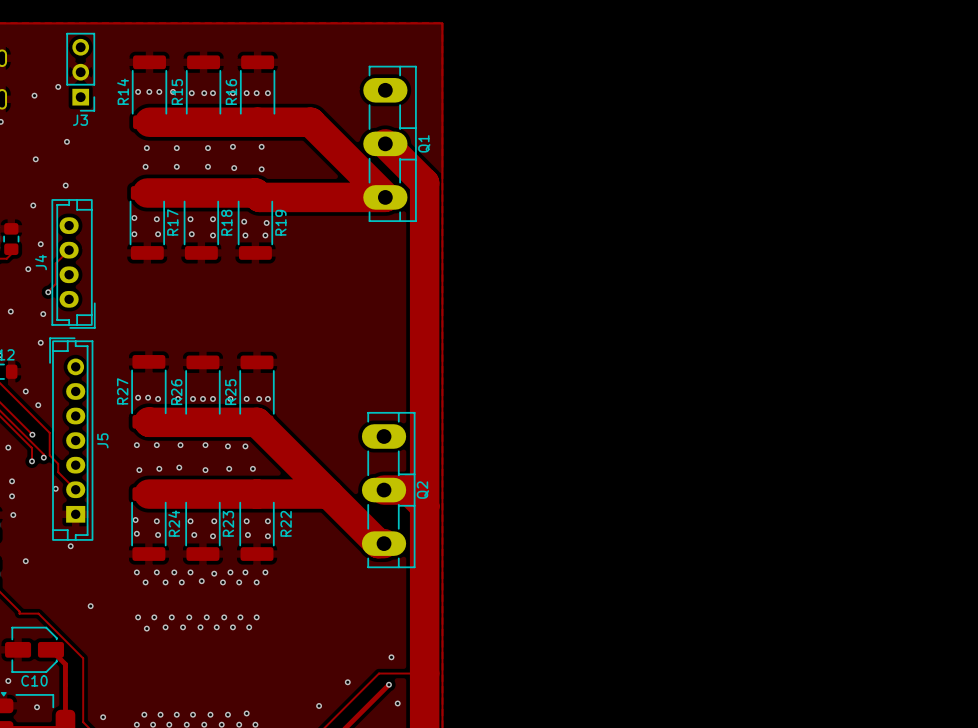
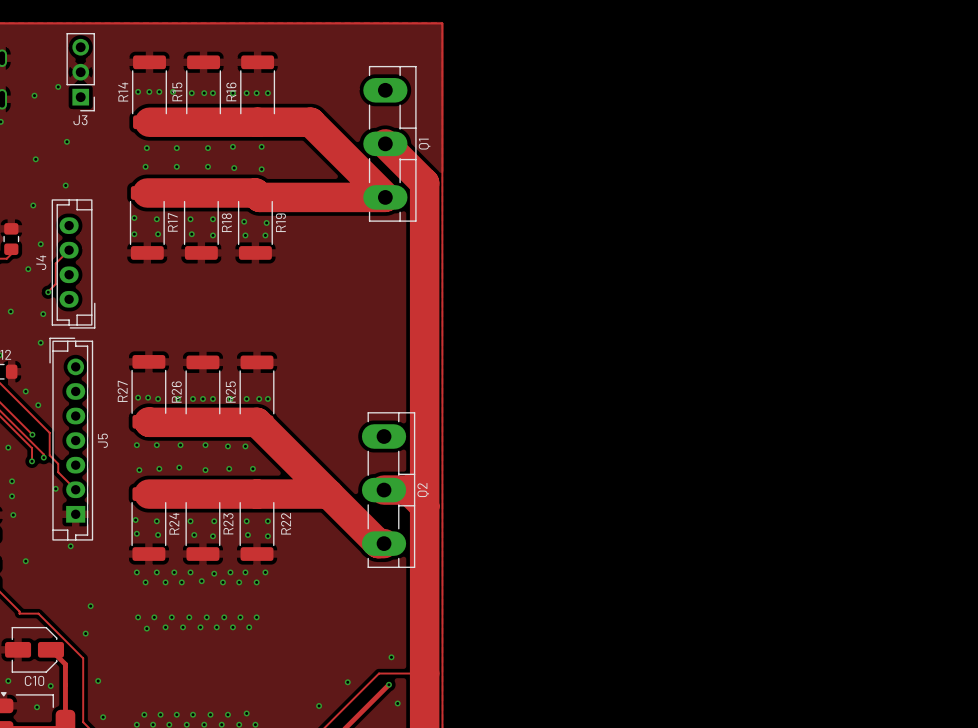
via: none -> (85, 633)
via: none -> (98, 681)
via: none -> (50, 686)

